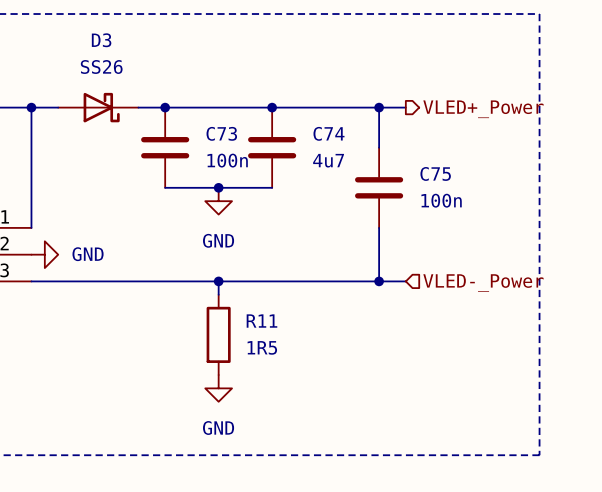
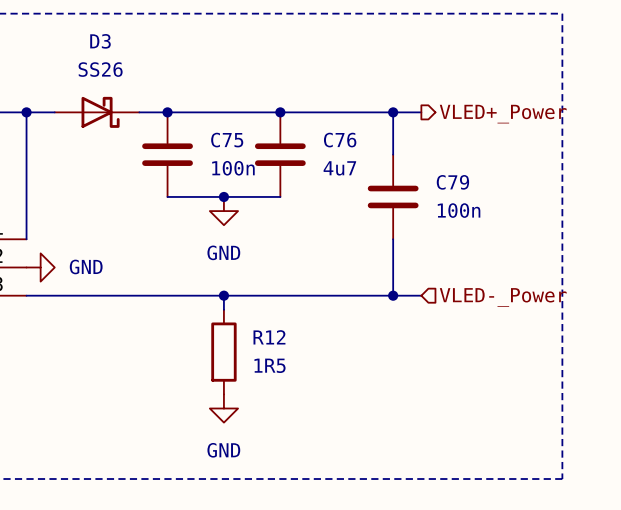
C73 name: C73 (221, 133) -> C75 (227, 140)
C74 name: C74 (328, 133) -> C76 (340, 140)
C75 name: C75 (435, 173) -> C79 (452, 182)
R11 name: R11 (261, 321) -> R12 (269, 337)

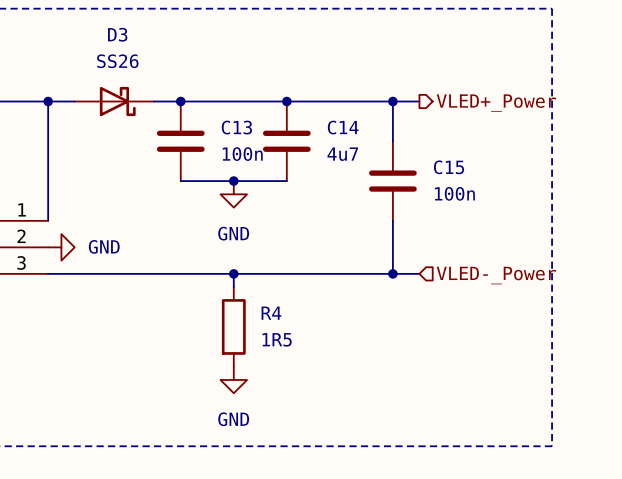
C75 name: C75 (227, 140) -> C13 (236, 127)
C76 name: C76 (340, 140) -> C14 (343, 127)
C79 name: C79 (452, 182) -> C15 (449, 167)
R12 name: R12 (269, 337) -> R4 (271, 313)

